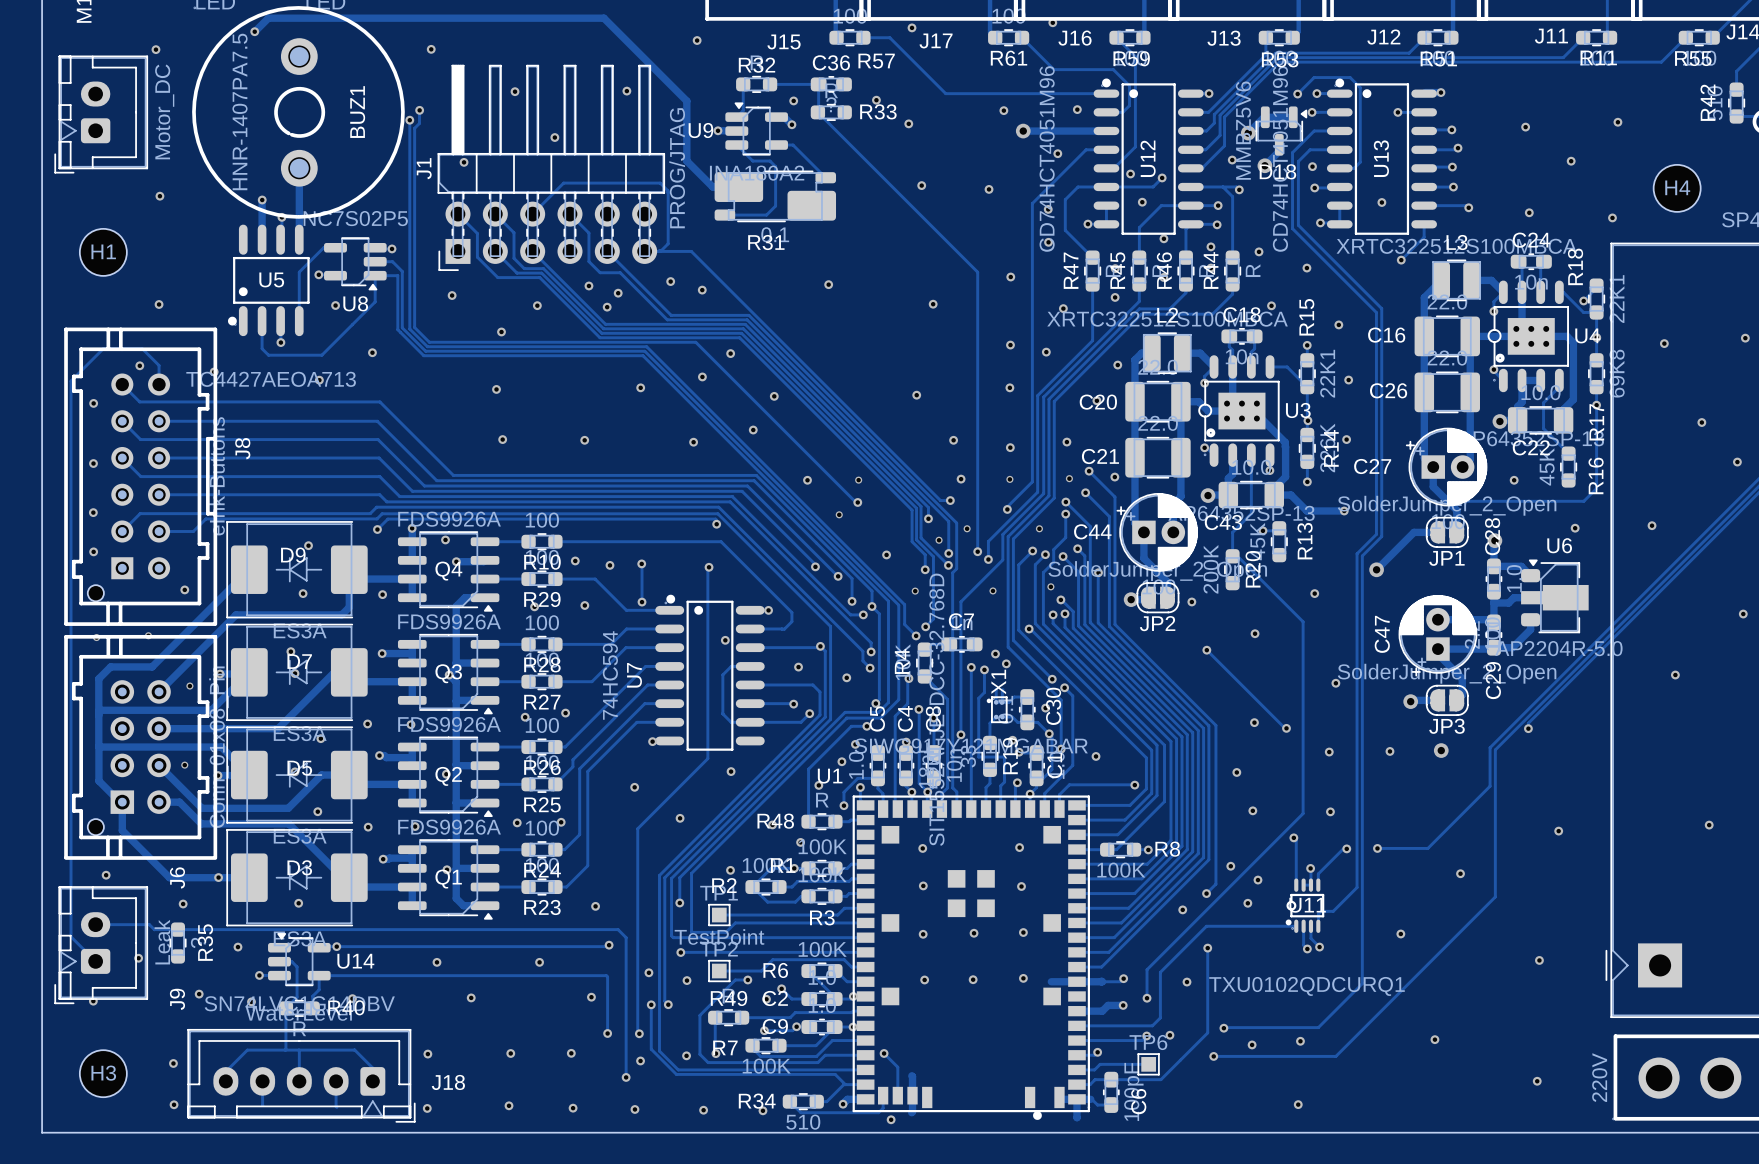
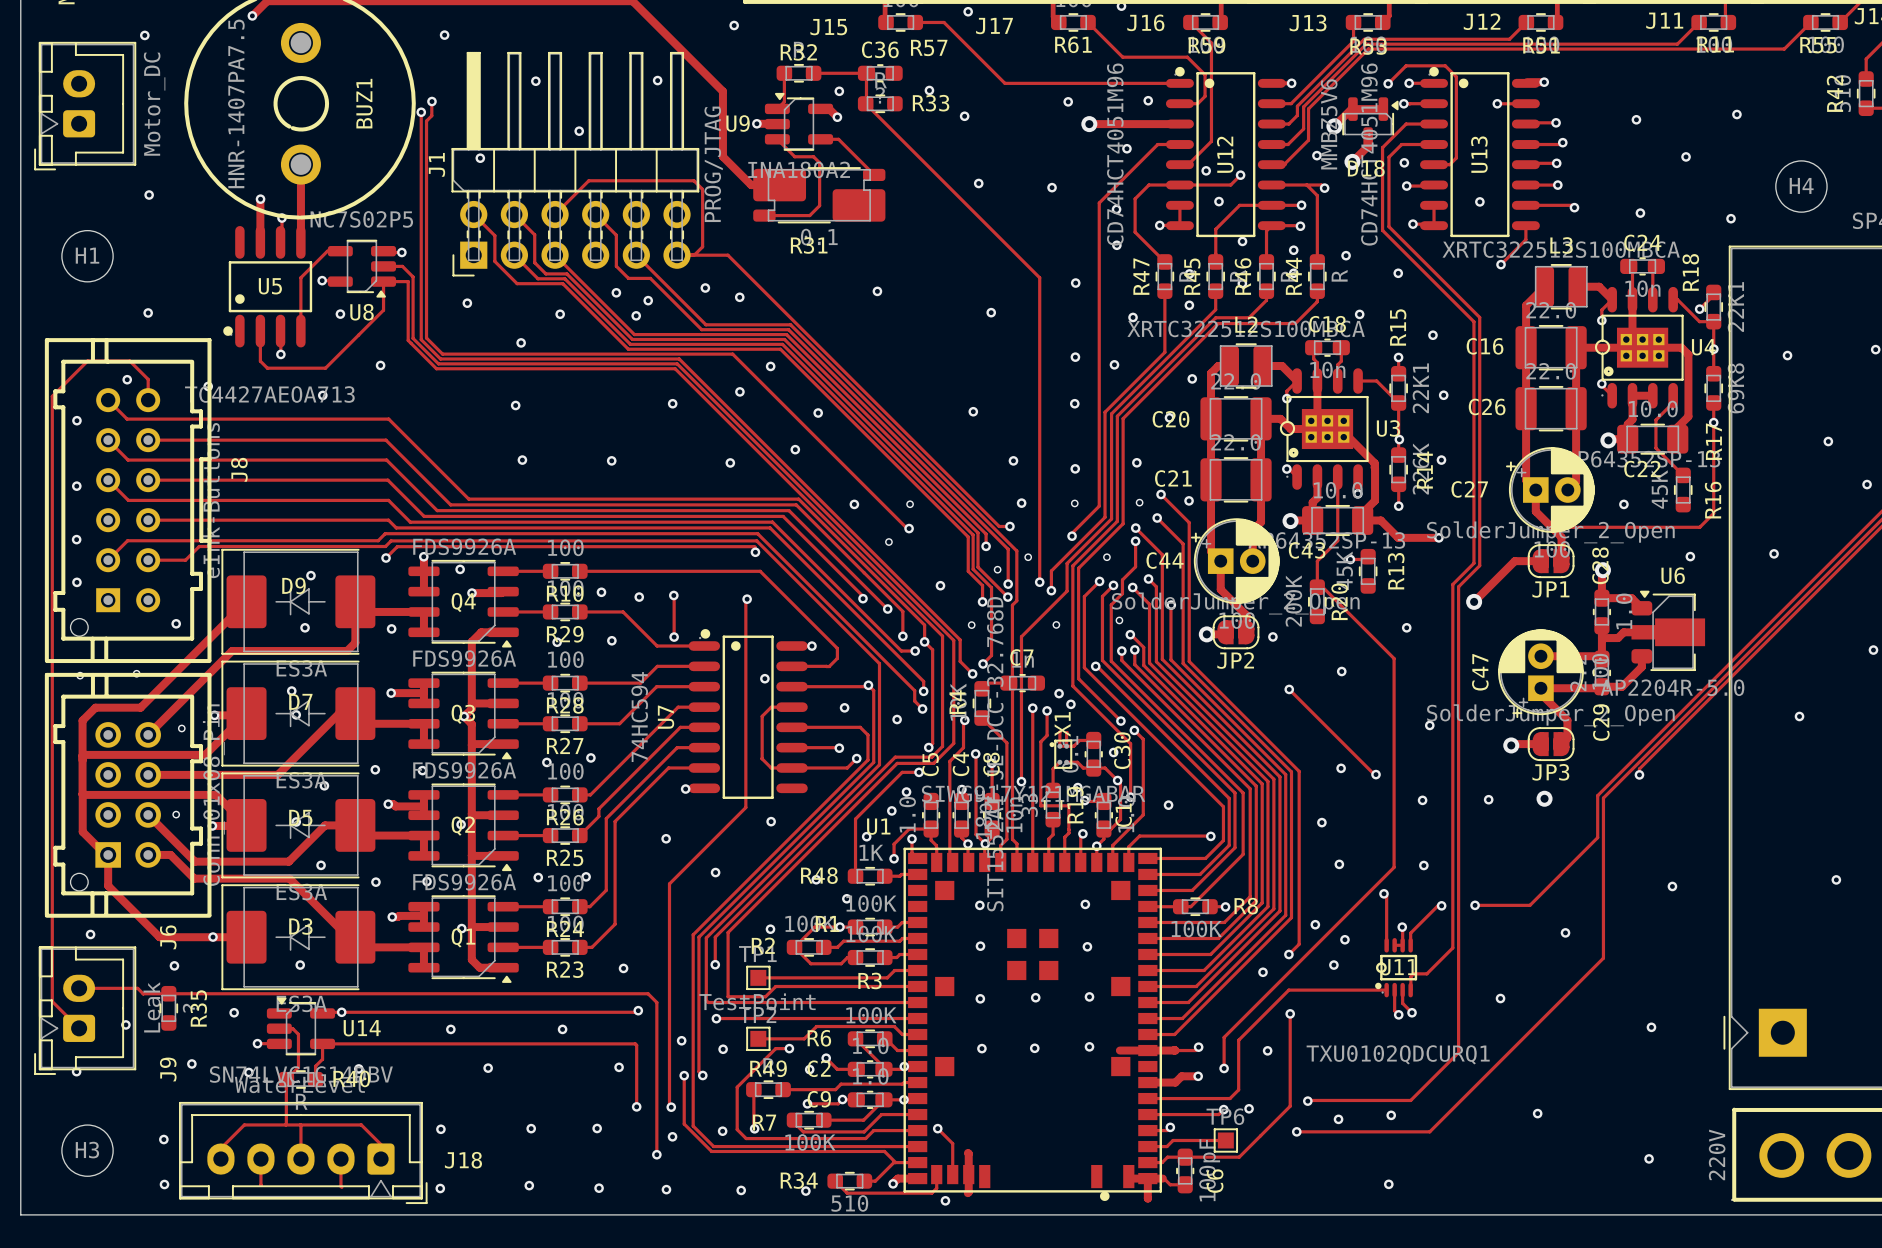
R48 value: R (822, 800) -> 1K (871, 852)

